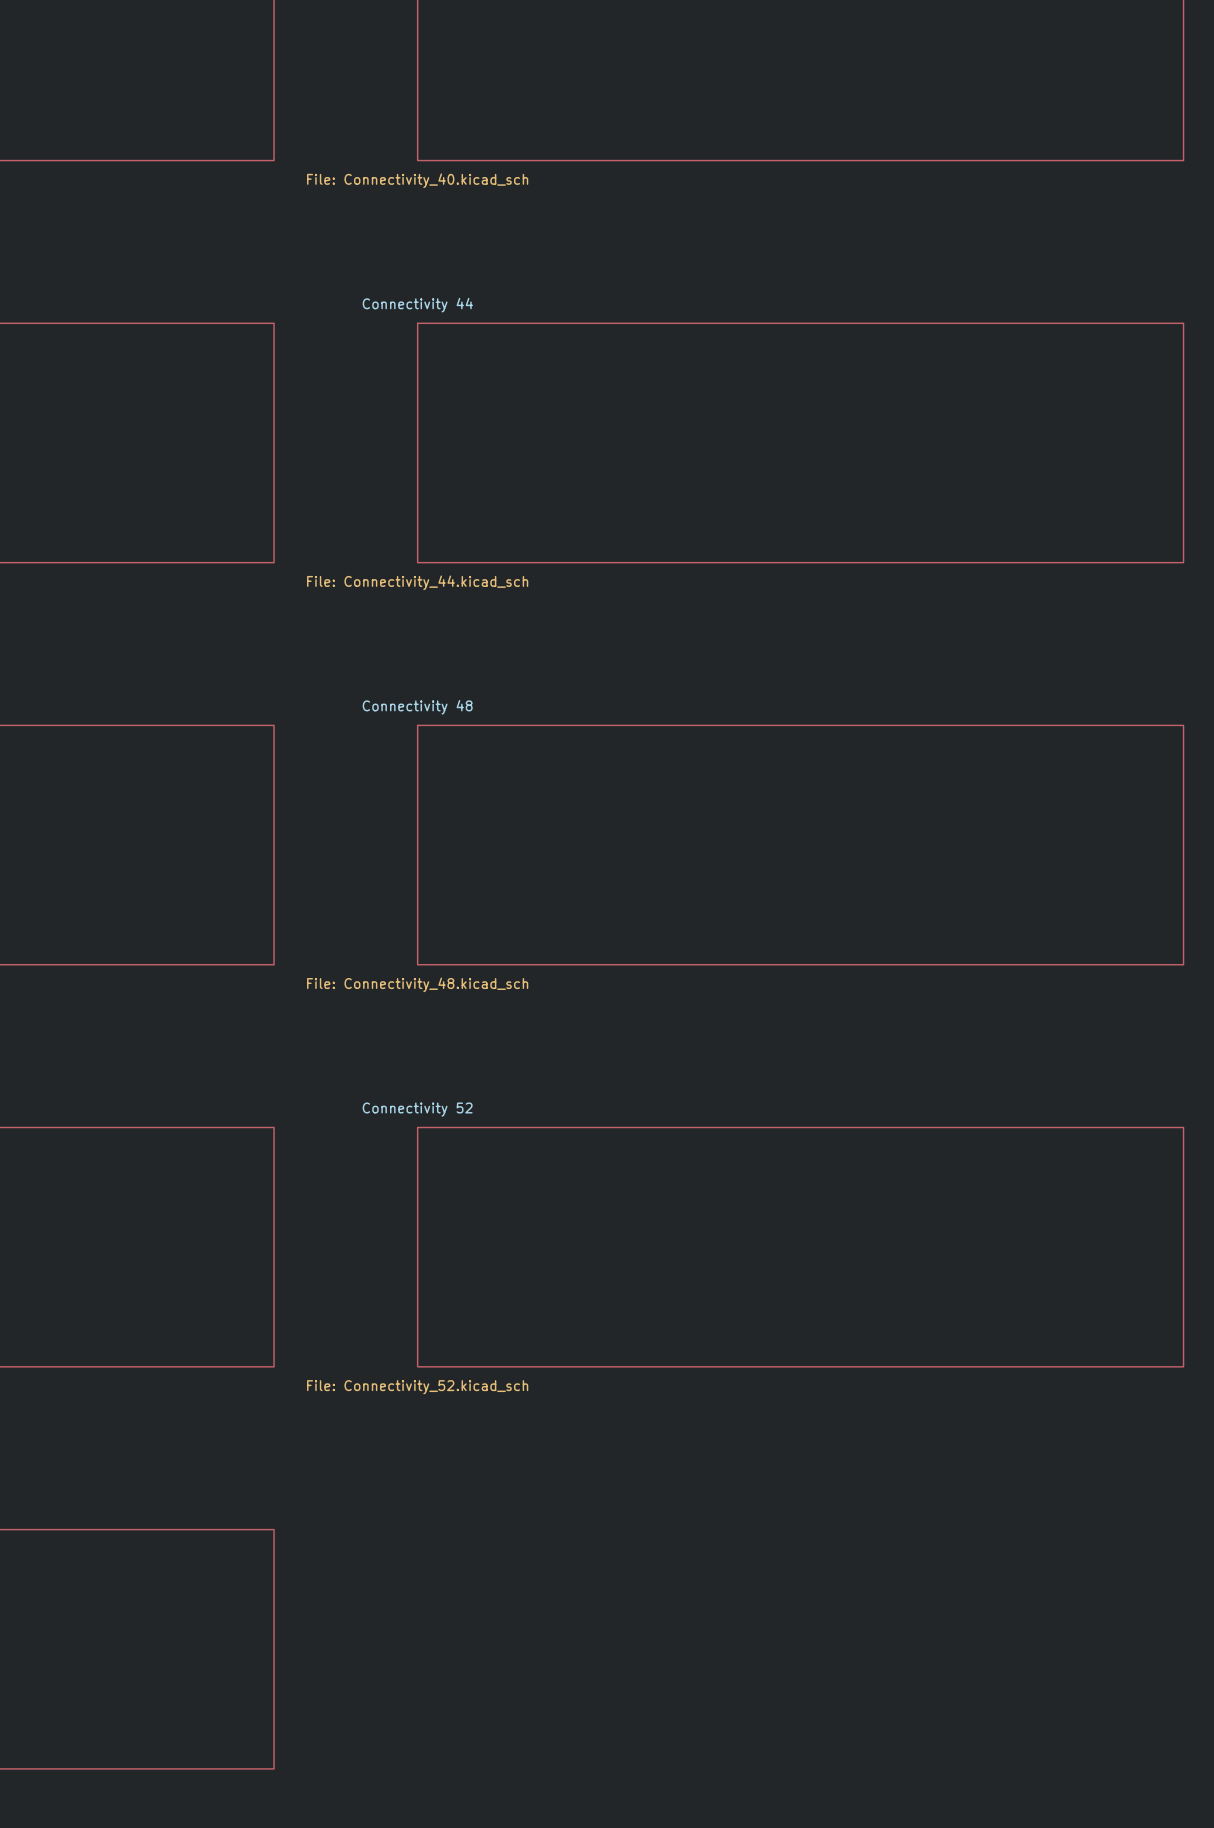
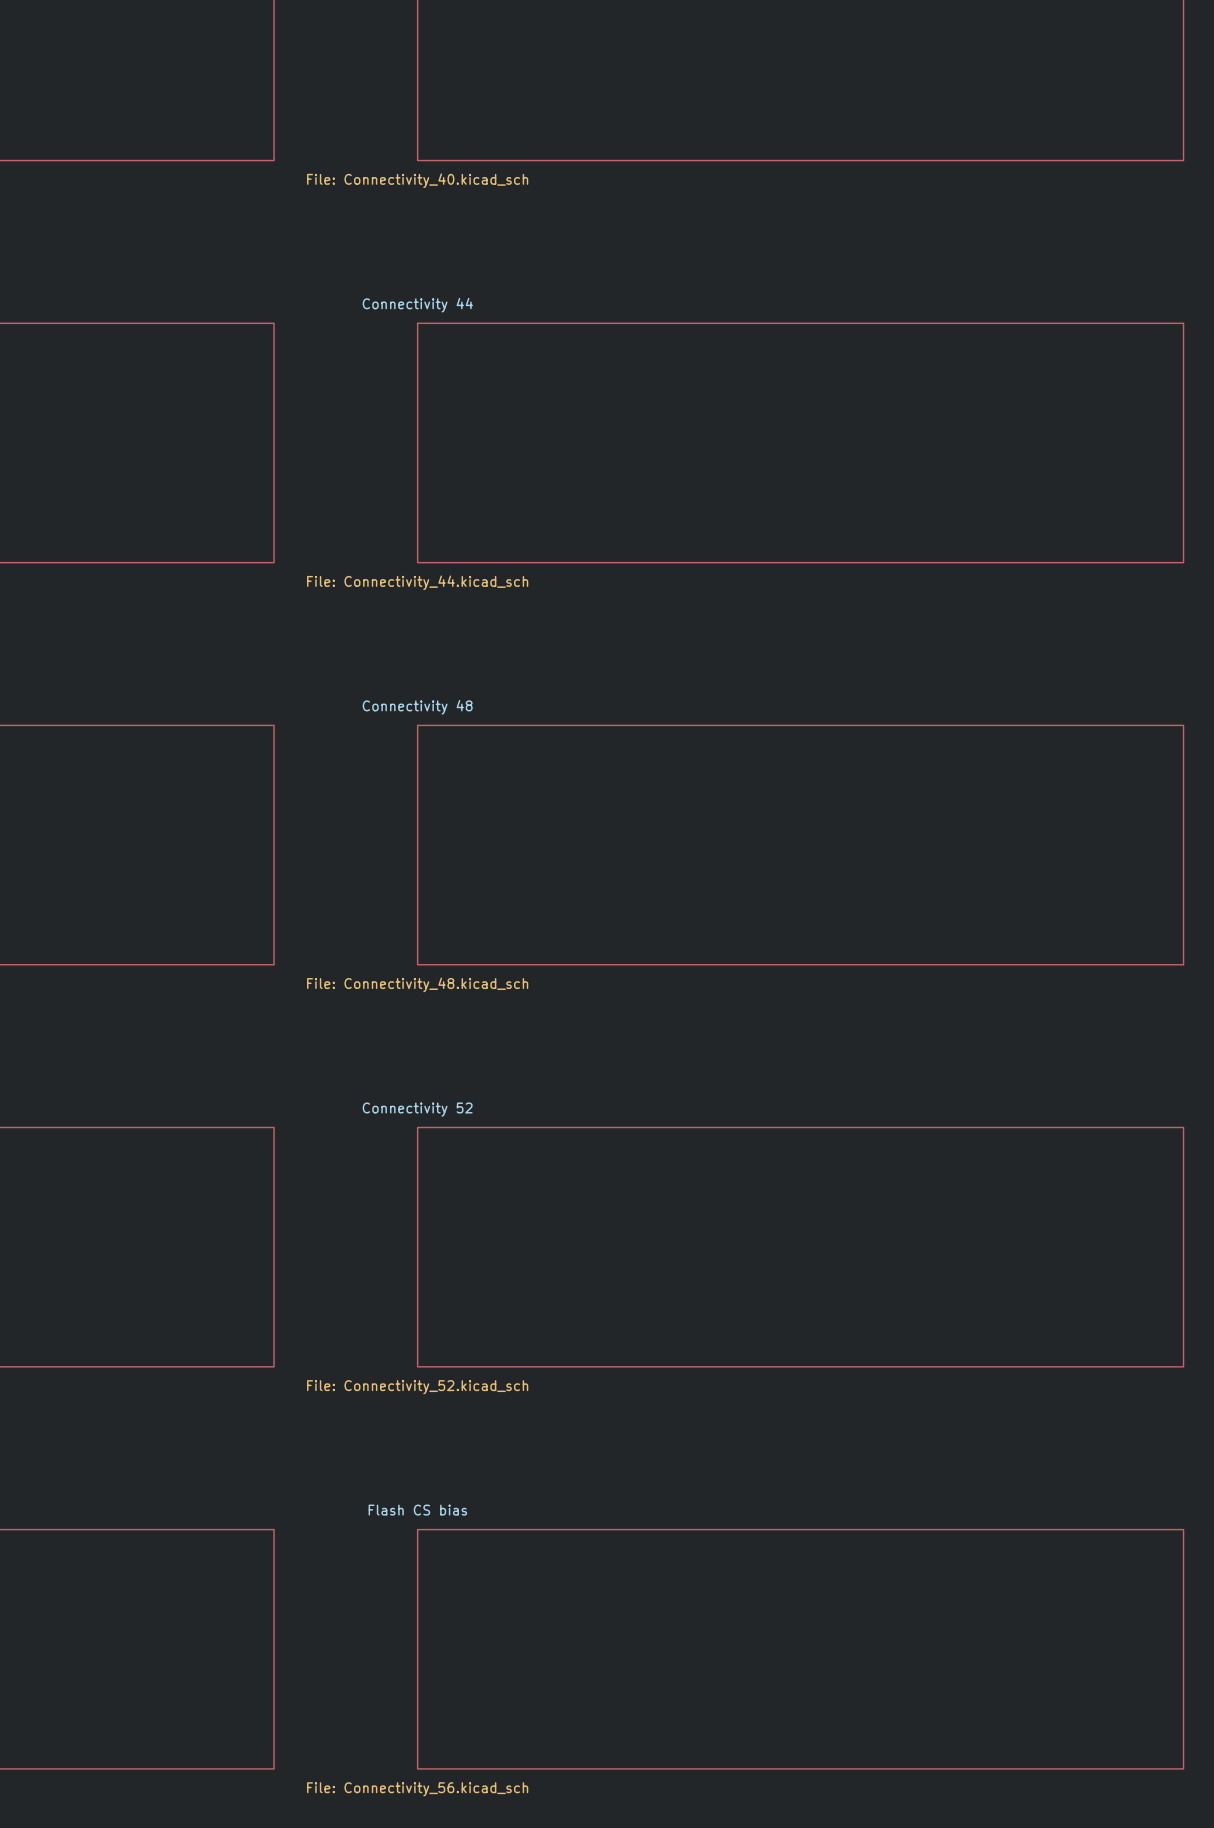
sheet Flash CS bias: none -> File: Connectivity_56.kicad_sch (800, 1649)

